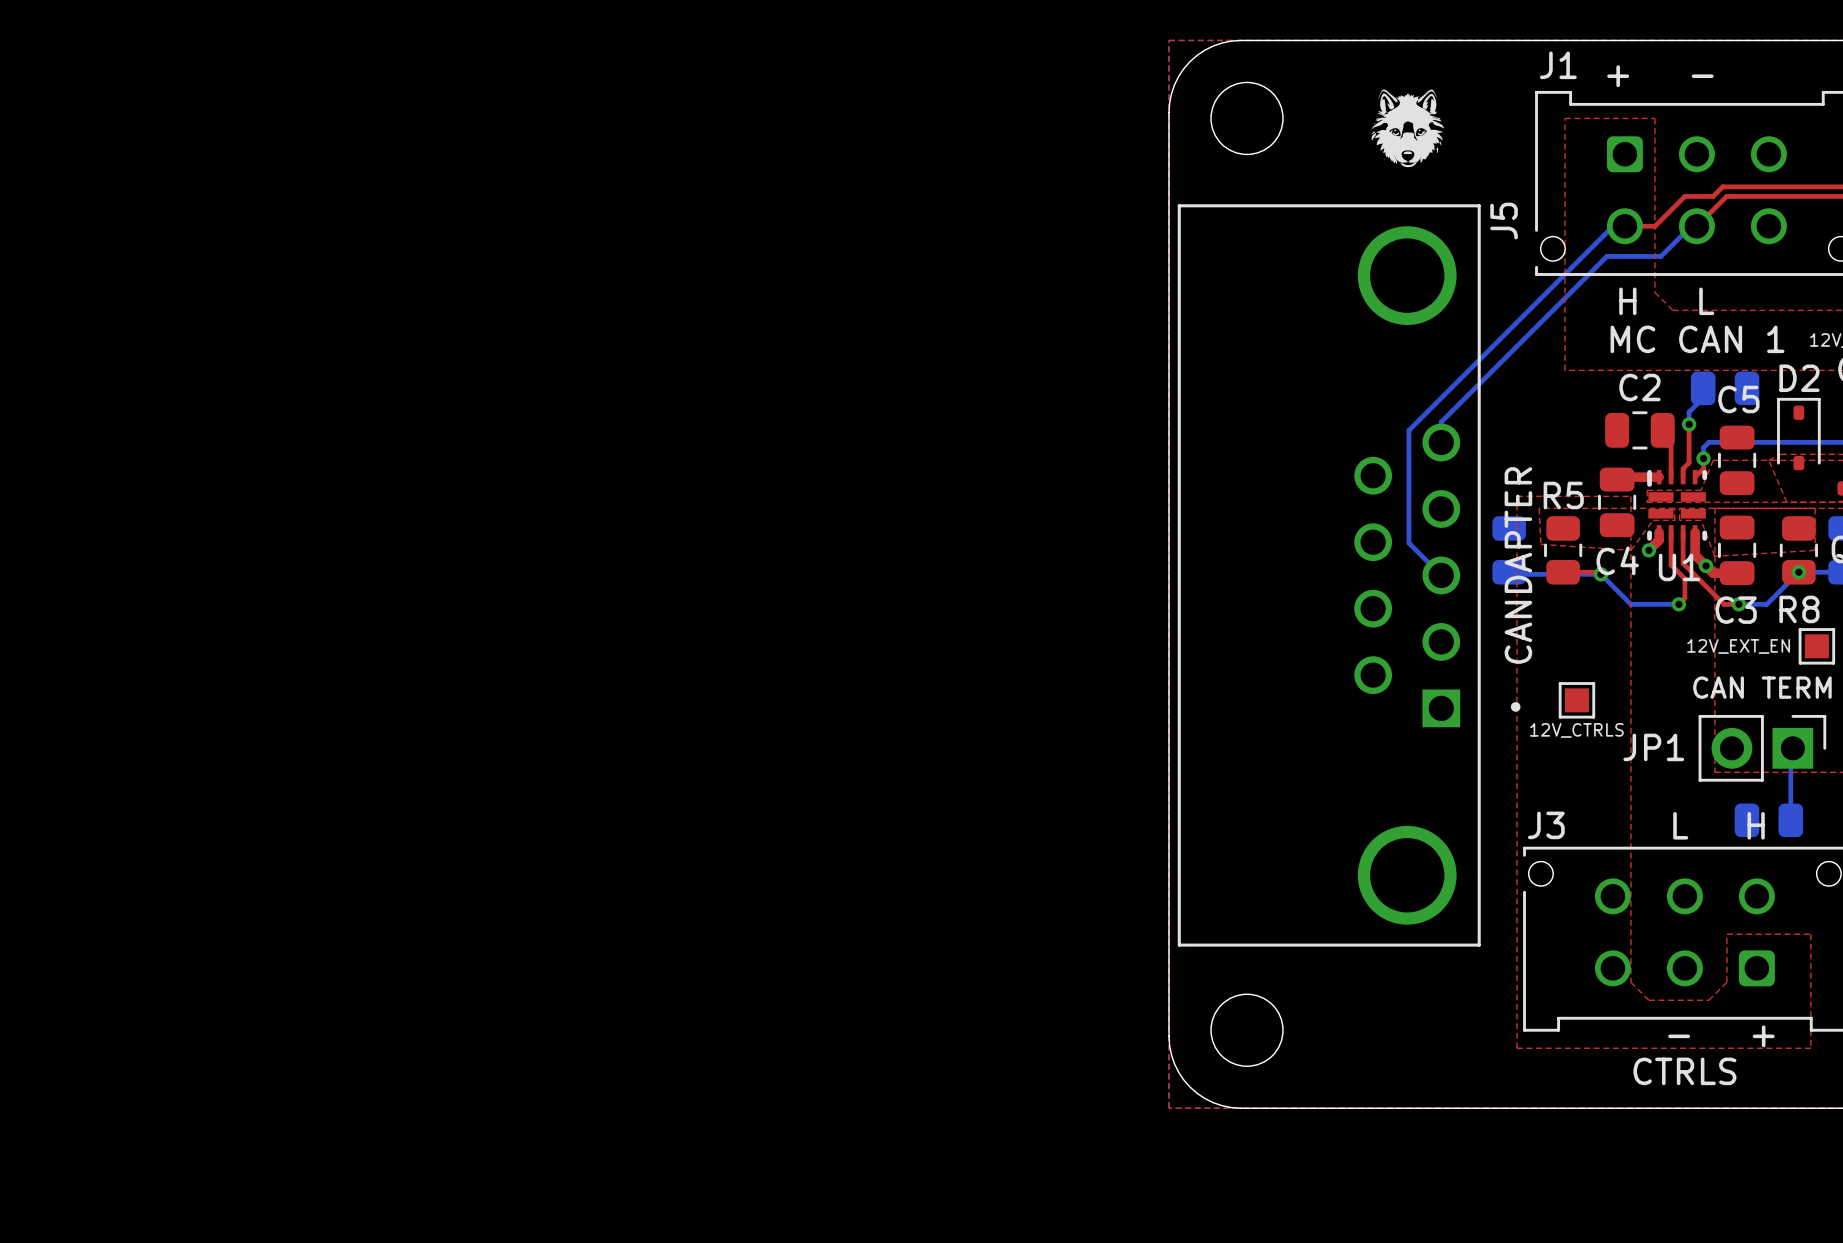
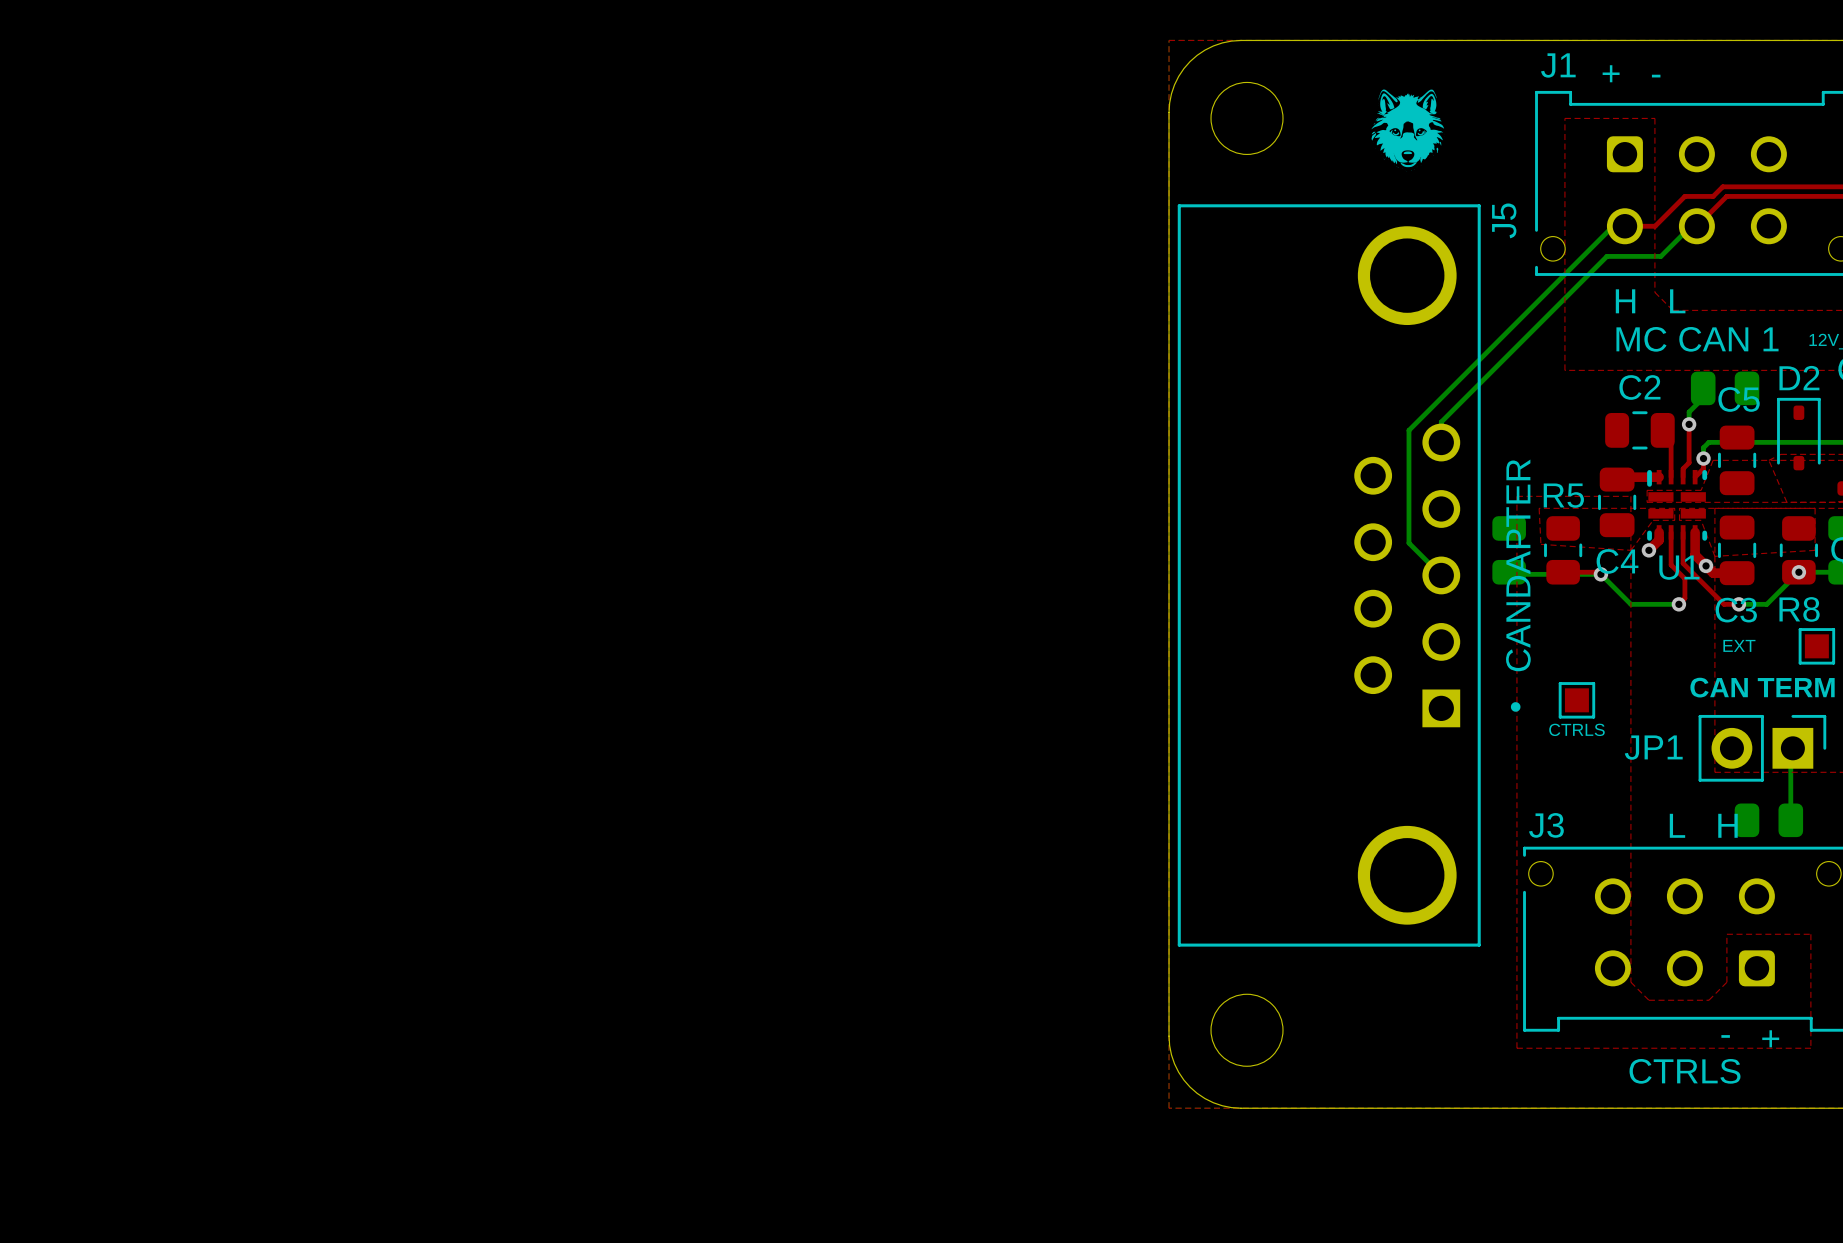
part value: 12V_EXT_EN (1738, 646) -> EXT (1739, 645)
part value: 12V_CTRLS (1576, 730) -> CTRLS (1576, 729)

